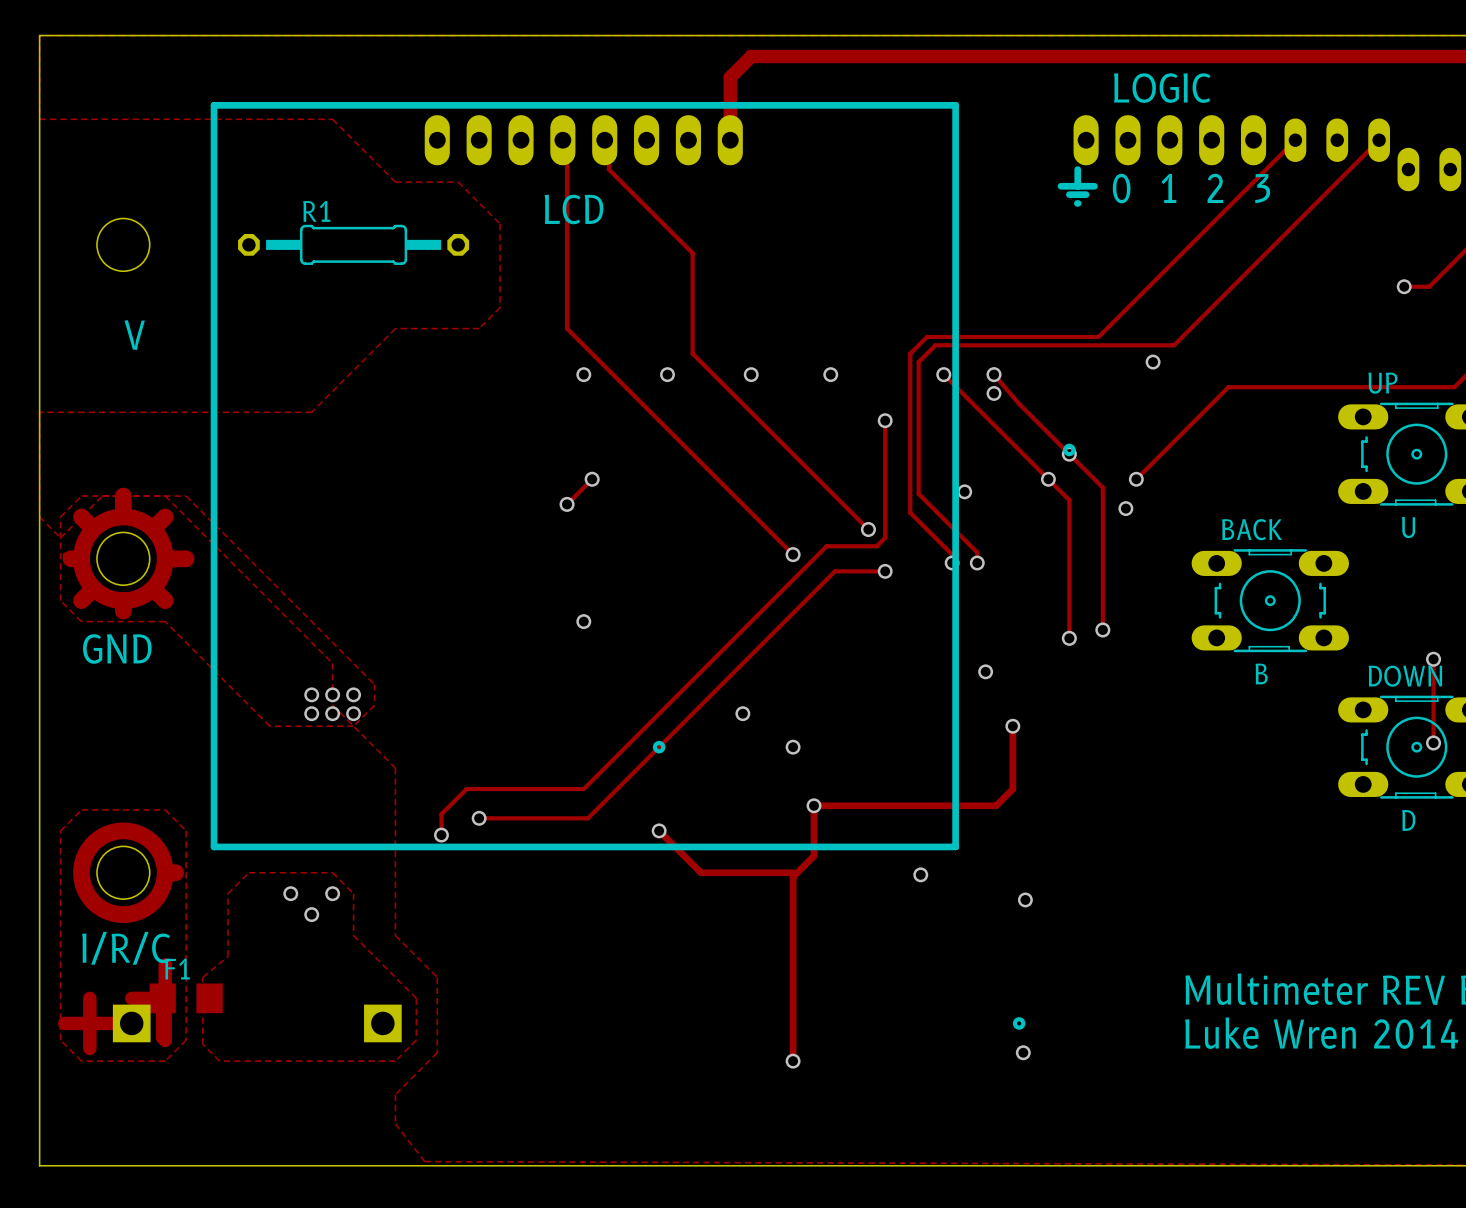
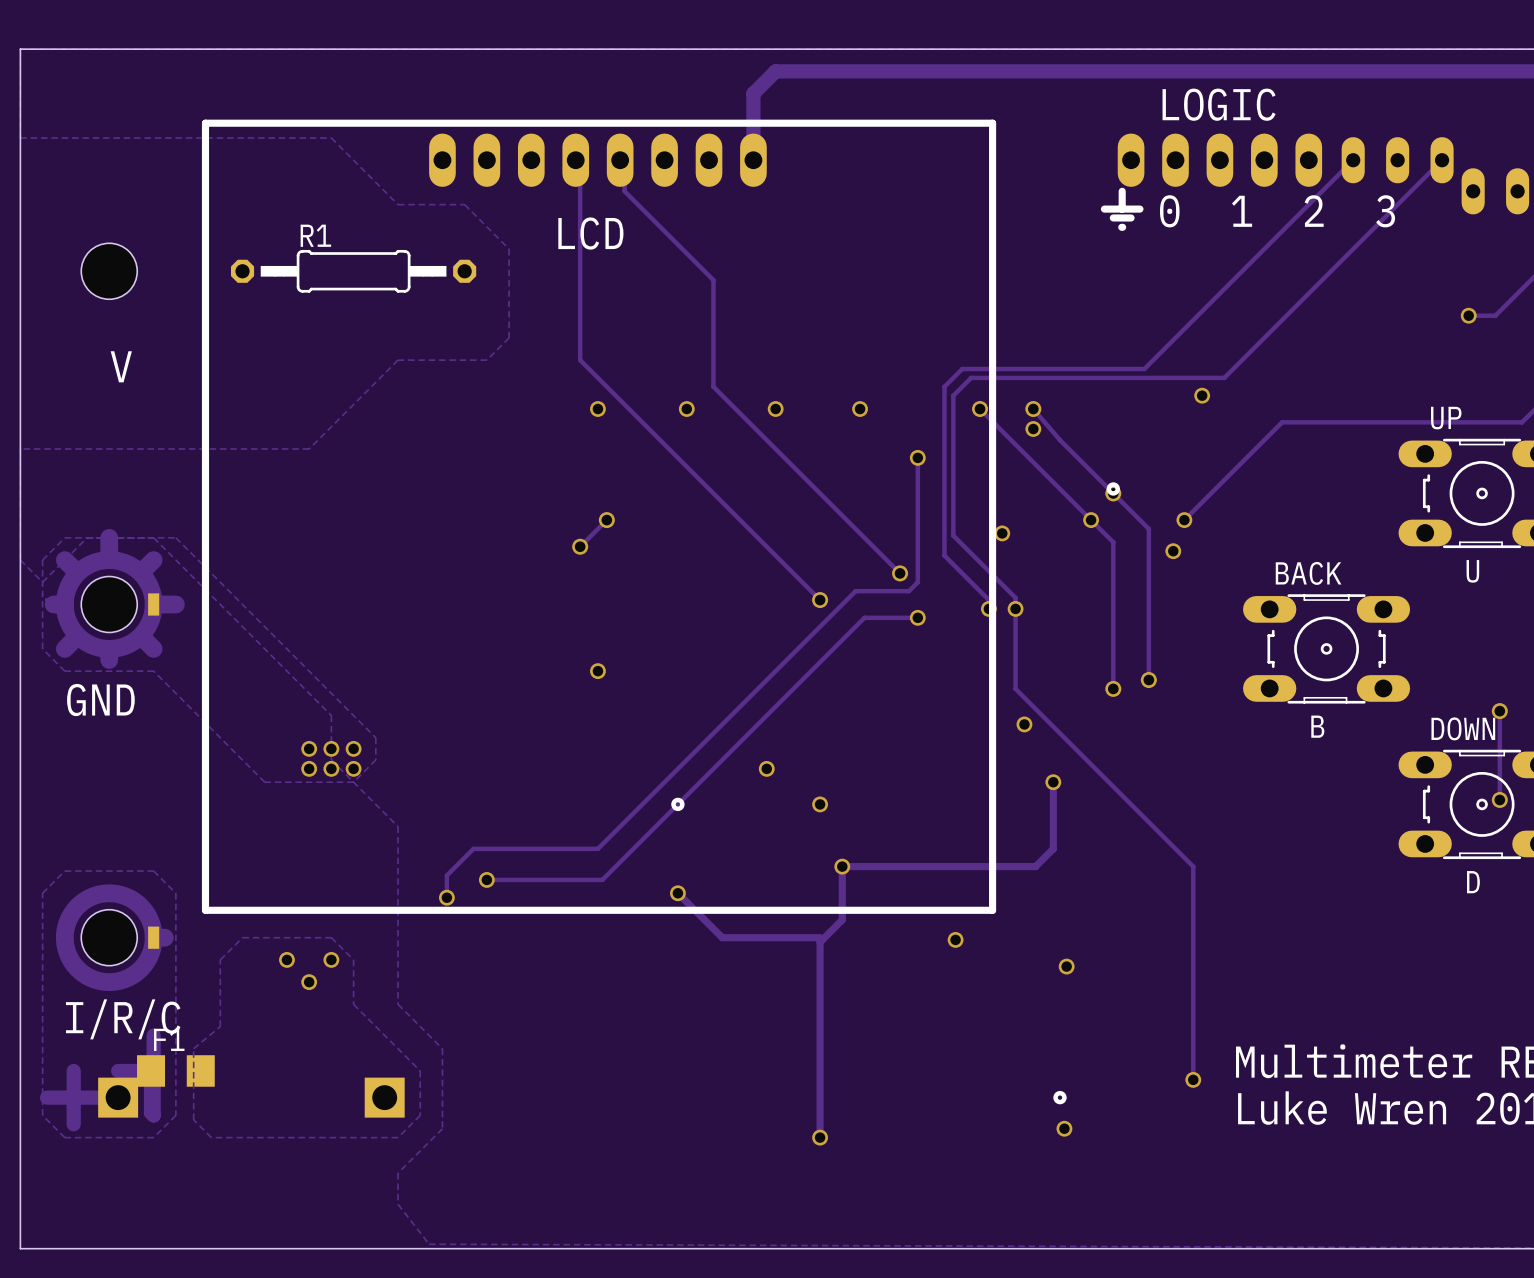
track: none -> (1015, 608) (1015, 688) (1193, 866) (1193, 1079)
via: none -> (1193, 1079)

